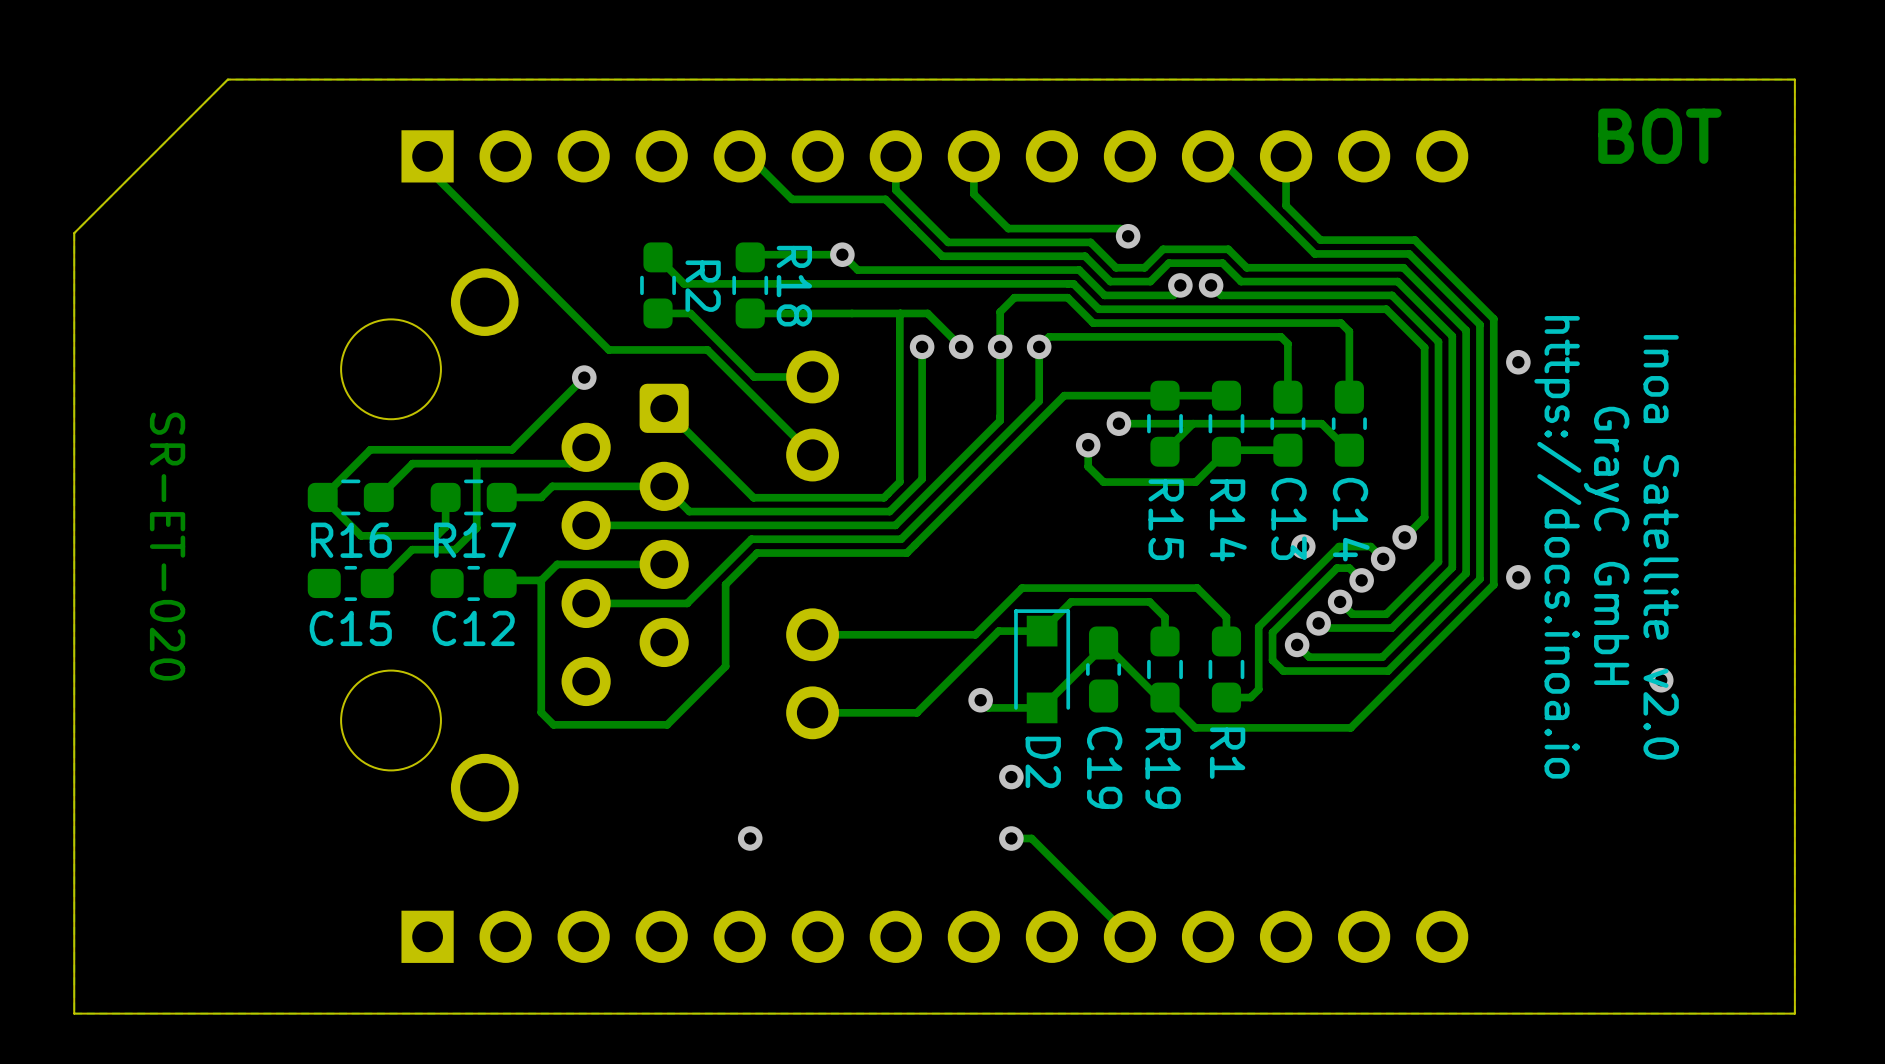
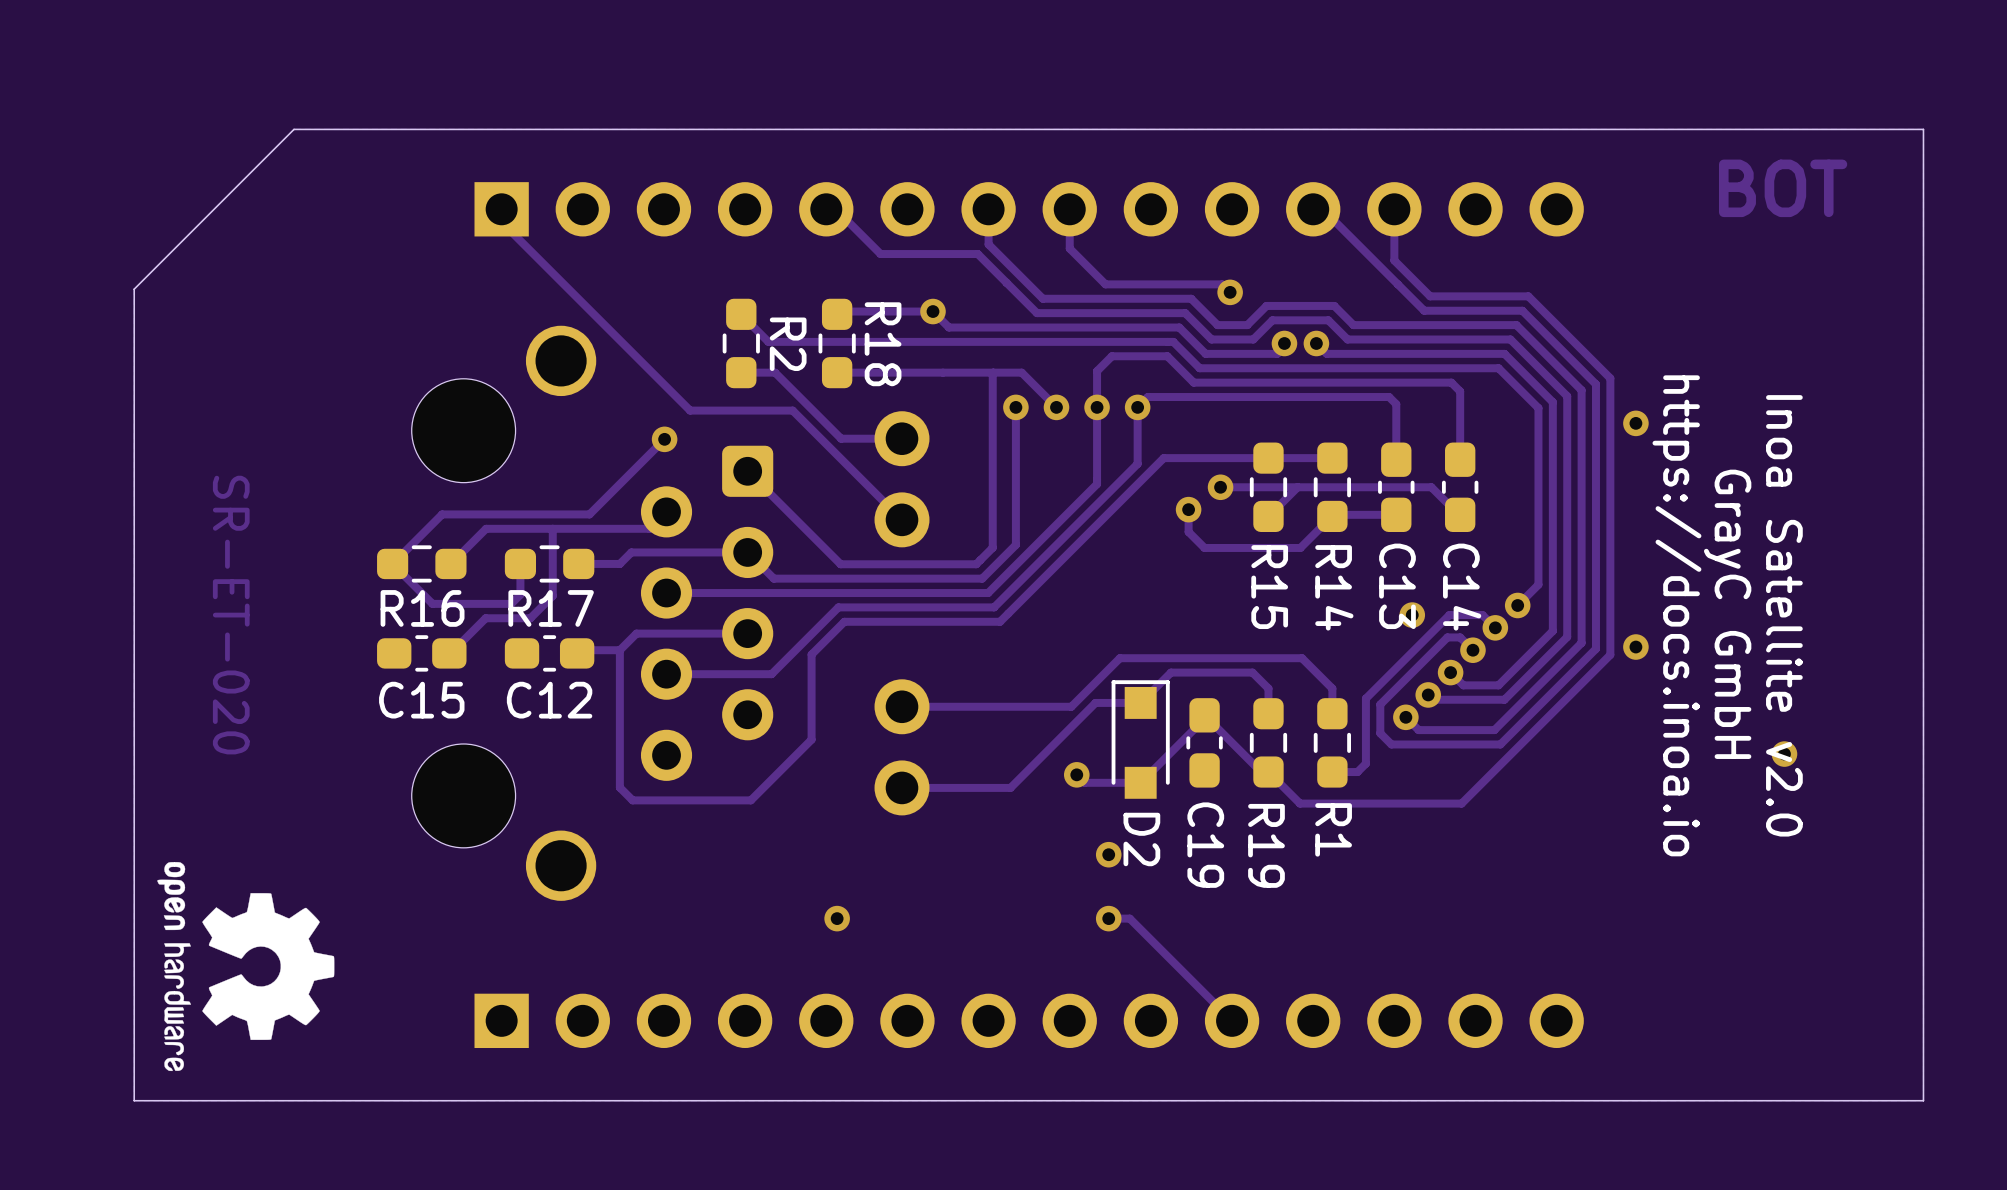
drawing: none -> [157, 862, 335, 1072]

